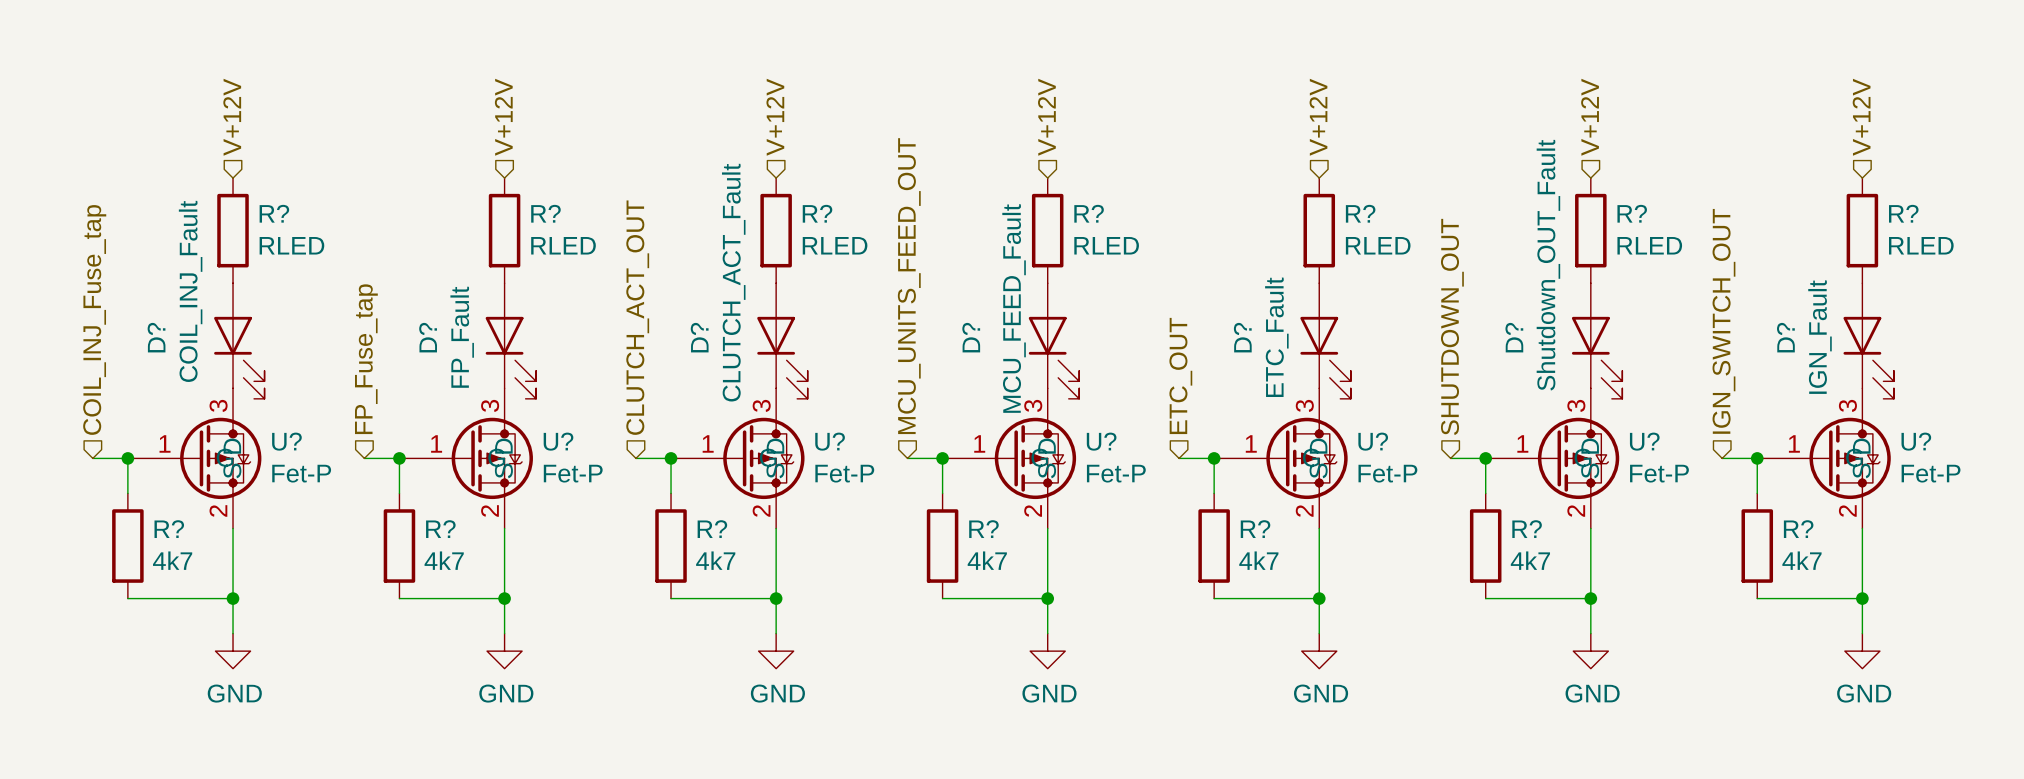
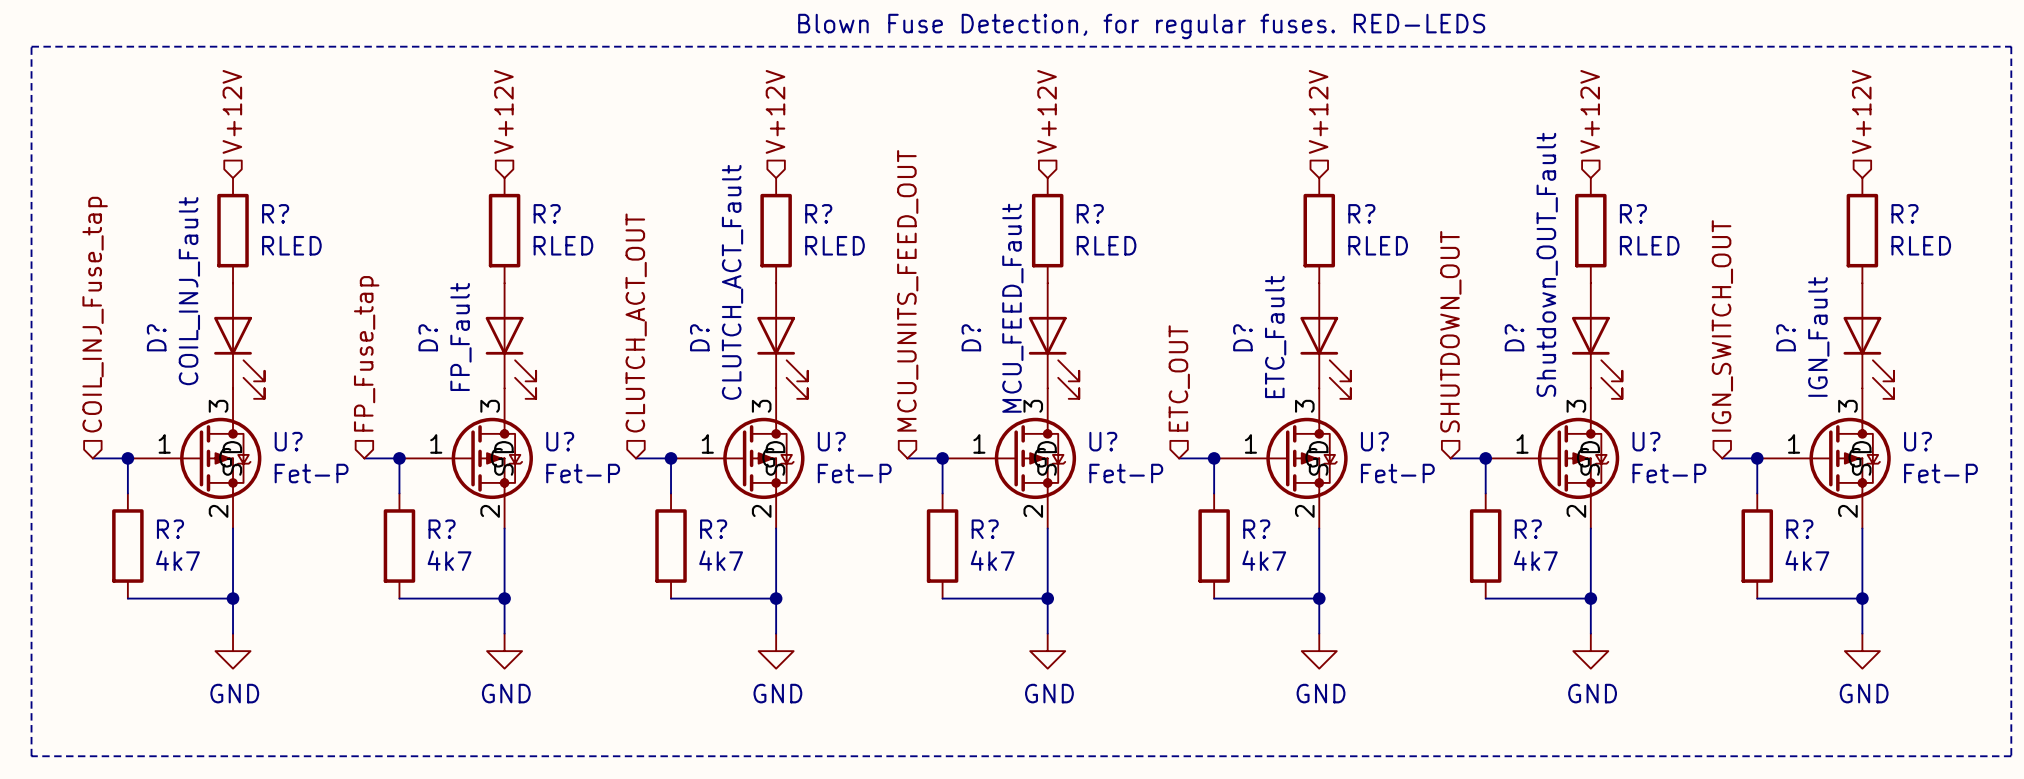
text: none -> Blown Fuse Detection, for regular fuses. RED-LEDS (1141, 26)
line: none -> (31, 46) (31, 756) (2011, 756) (2011, 46) (31, 46)

